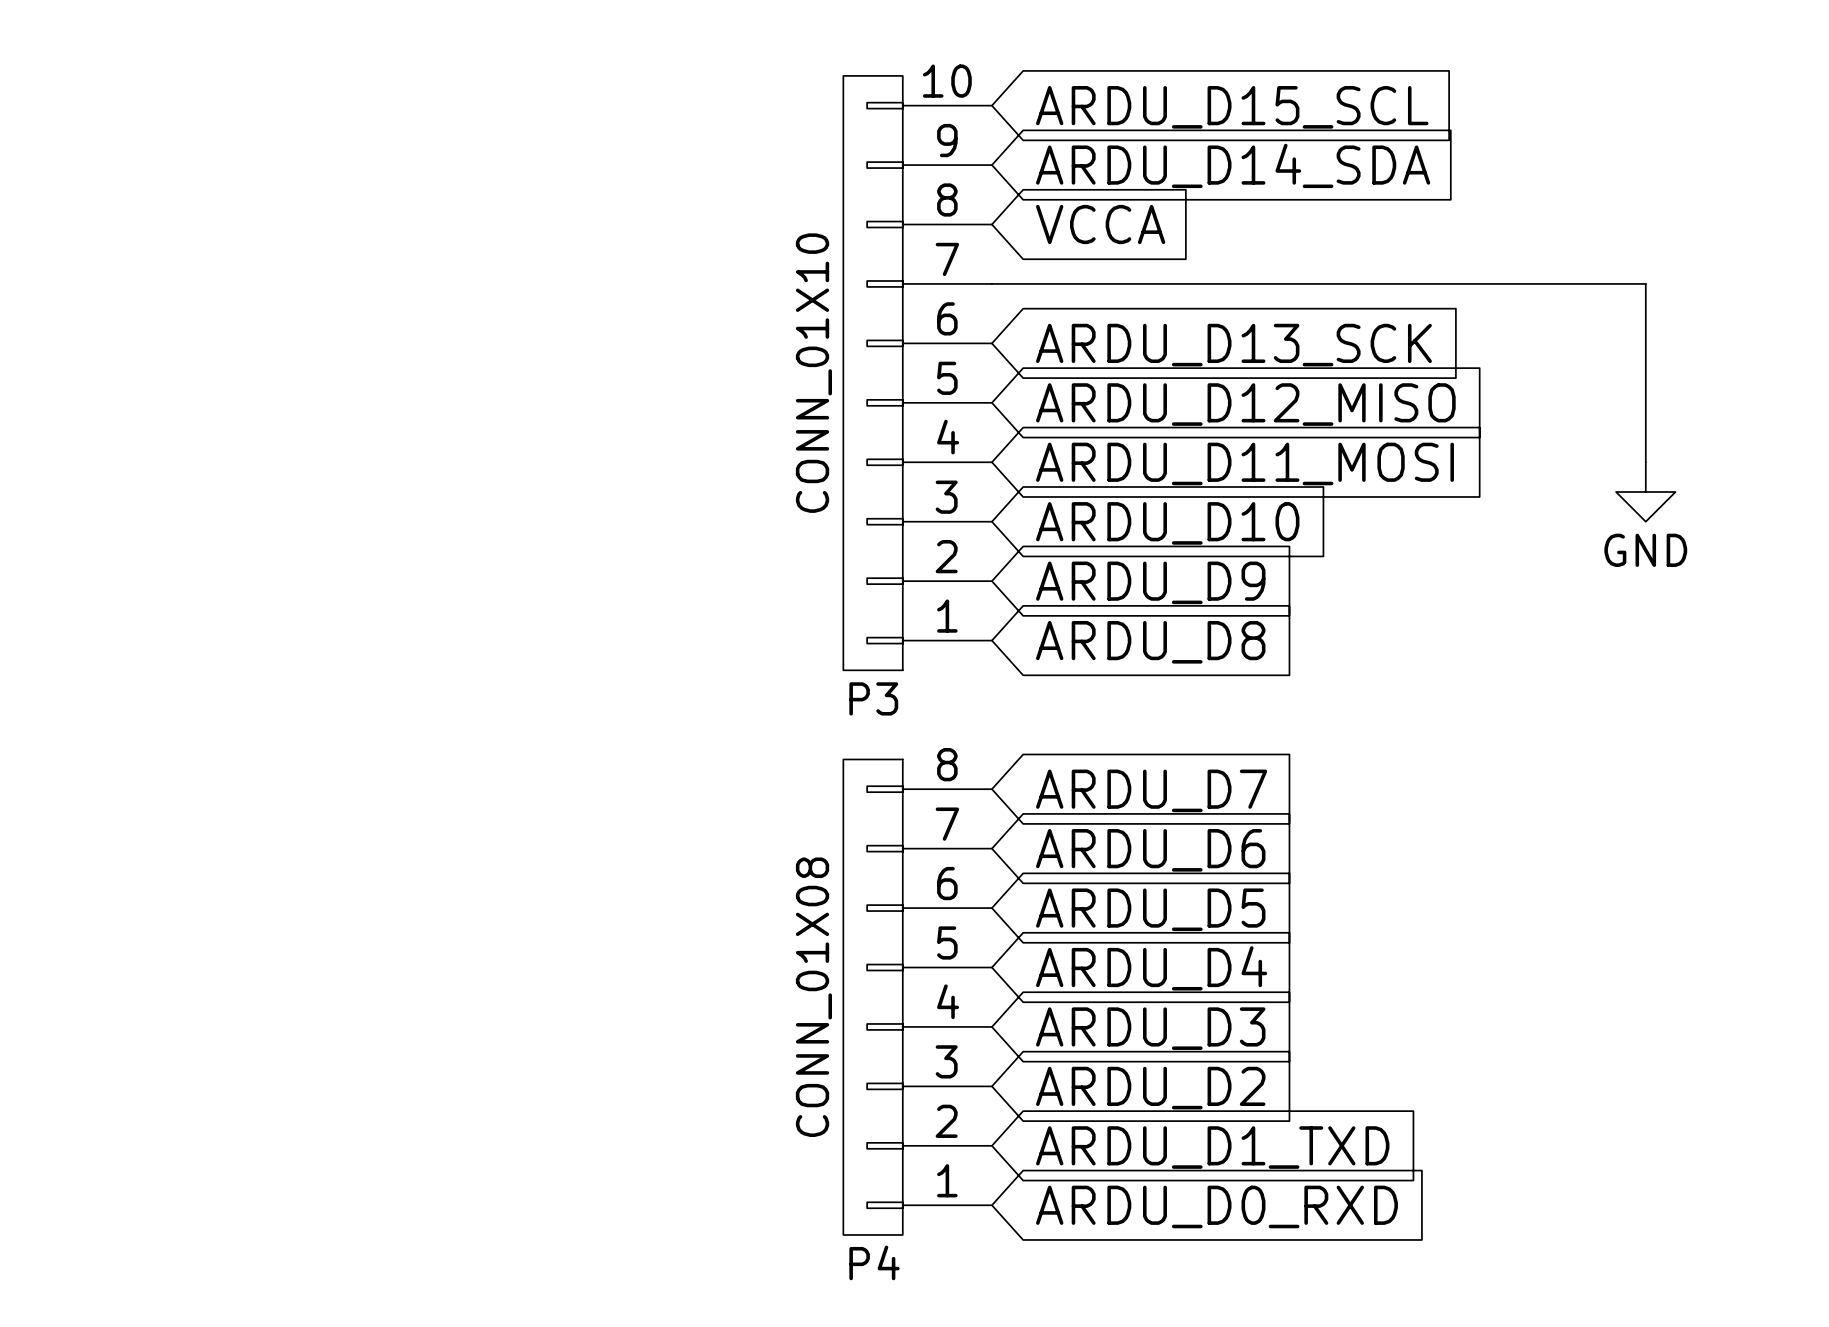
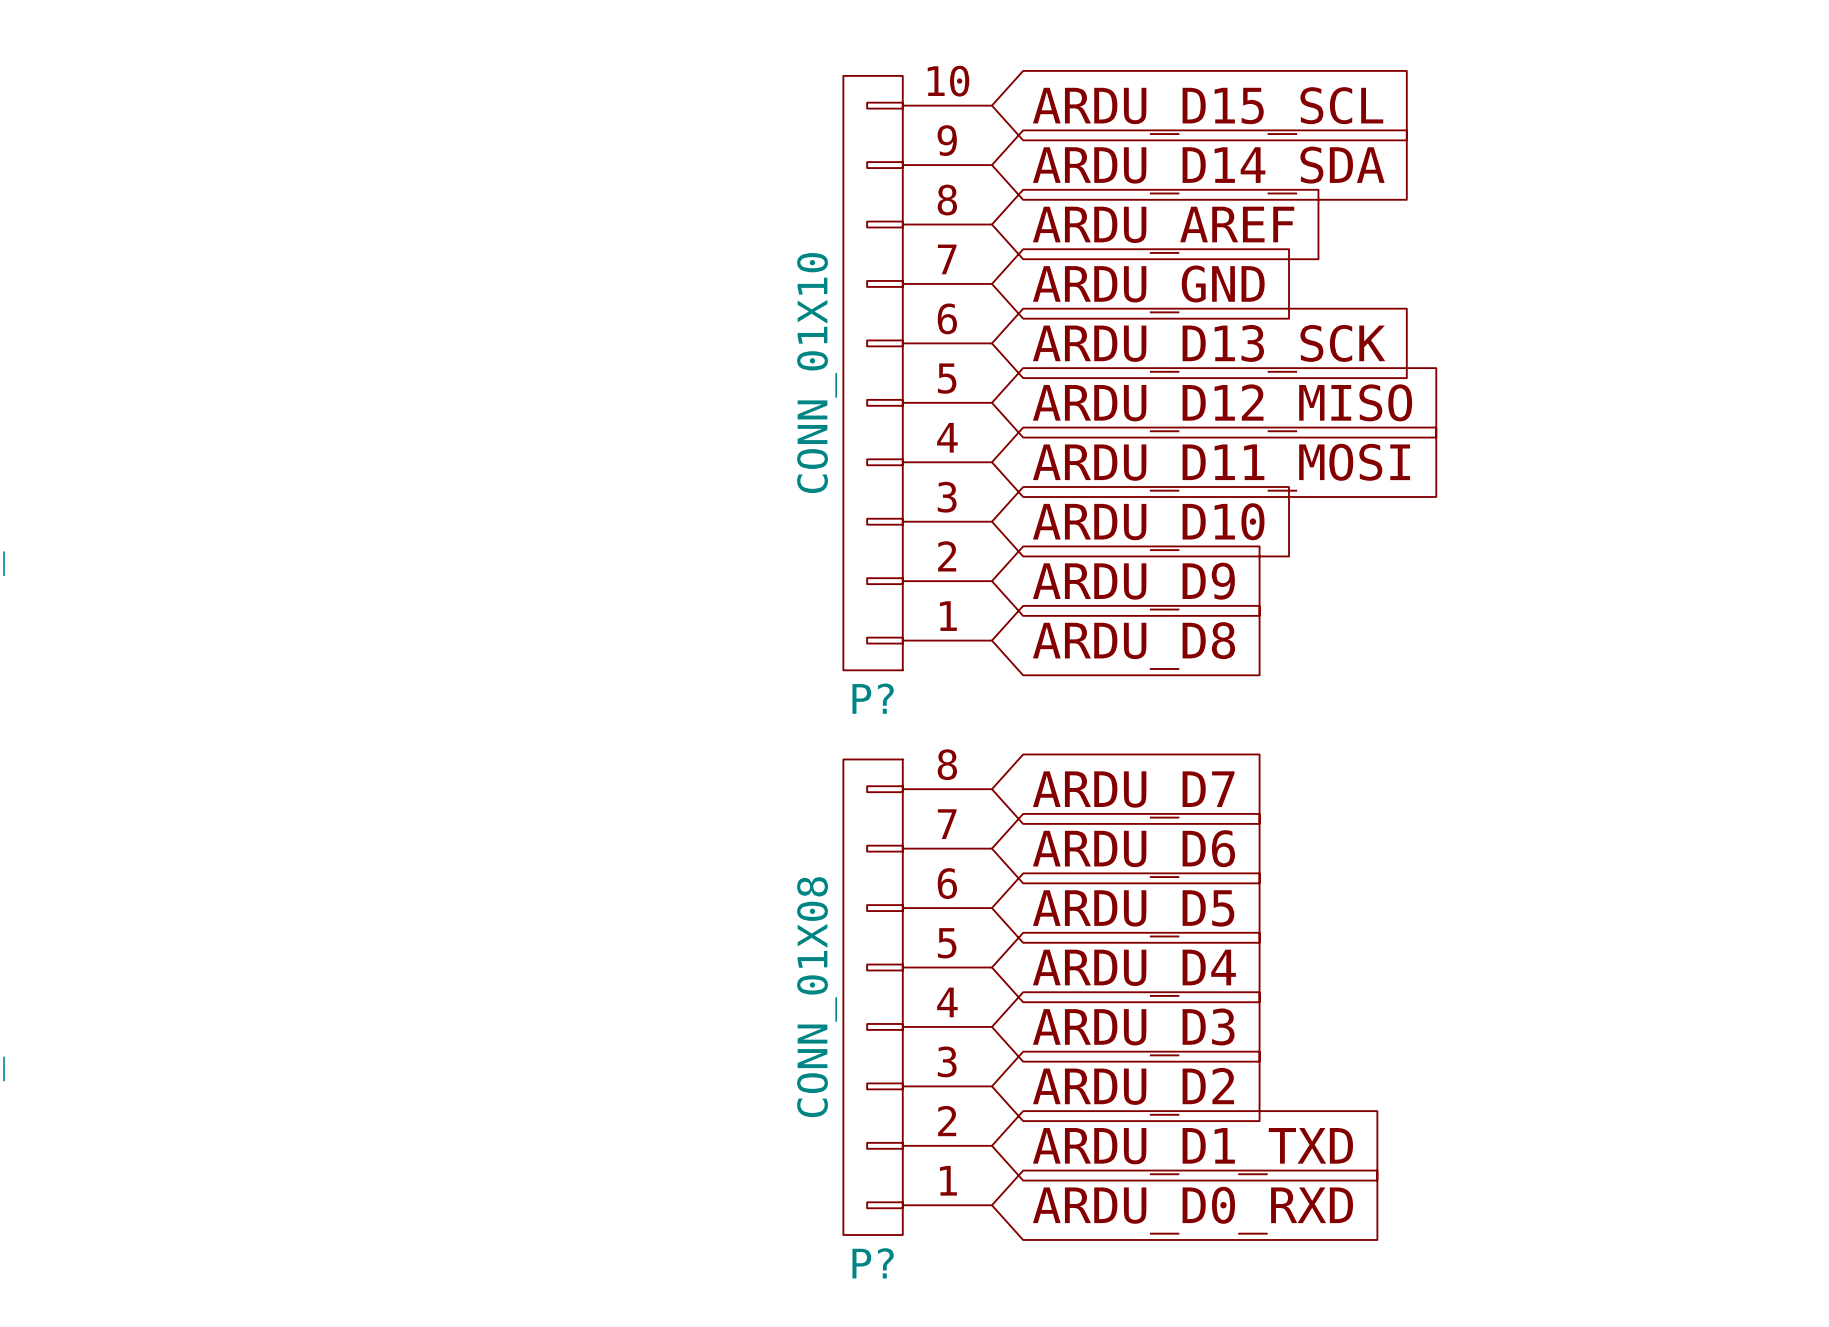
global label: VCCA (1100, 224) -> ARDU_AREF (1163, 230)
wire: (991, 283) (1645, 283) (1645, 462) -> none
global label: none -> ARDU_GND (1148, 289)
power symbol: GND (1645, 491) -> none
P3 name: P3 (873, 698) -> P? (873, 698)
P4 name: P4 (874, 1262) -> P? (873, 1263)

